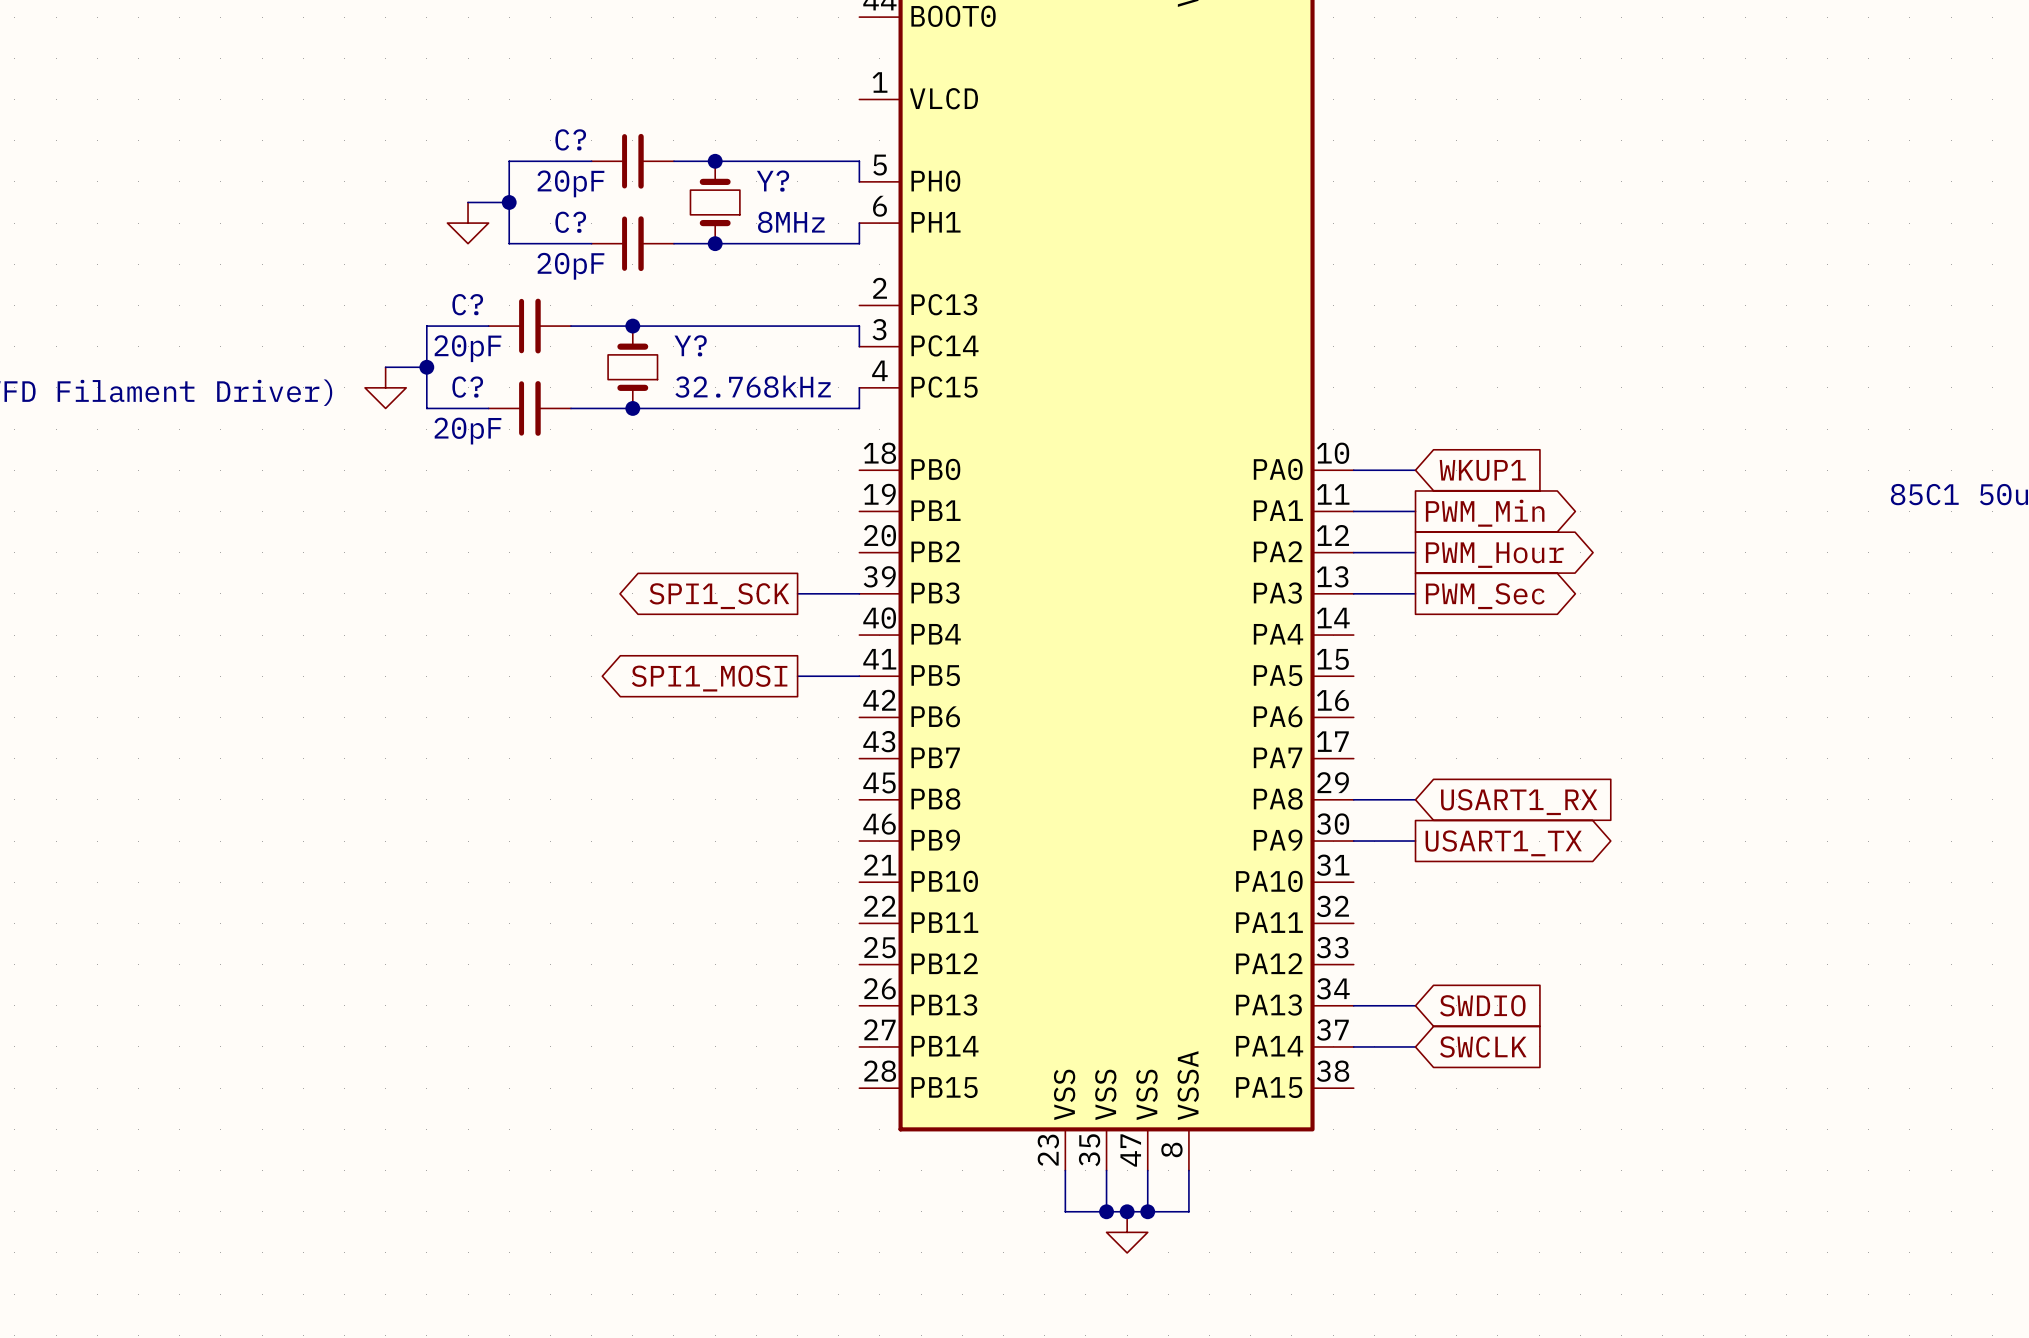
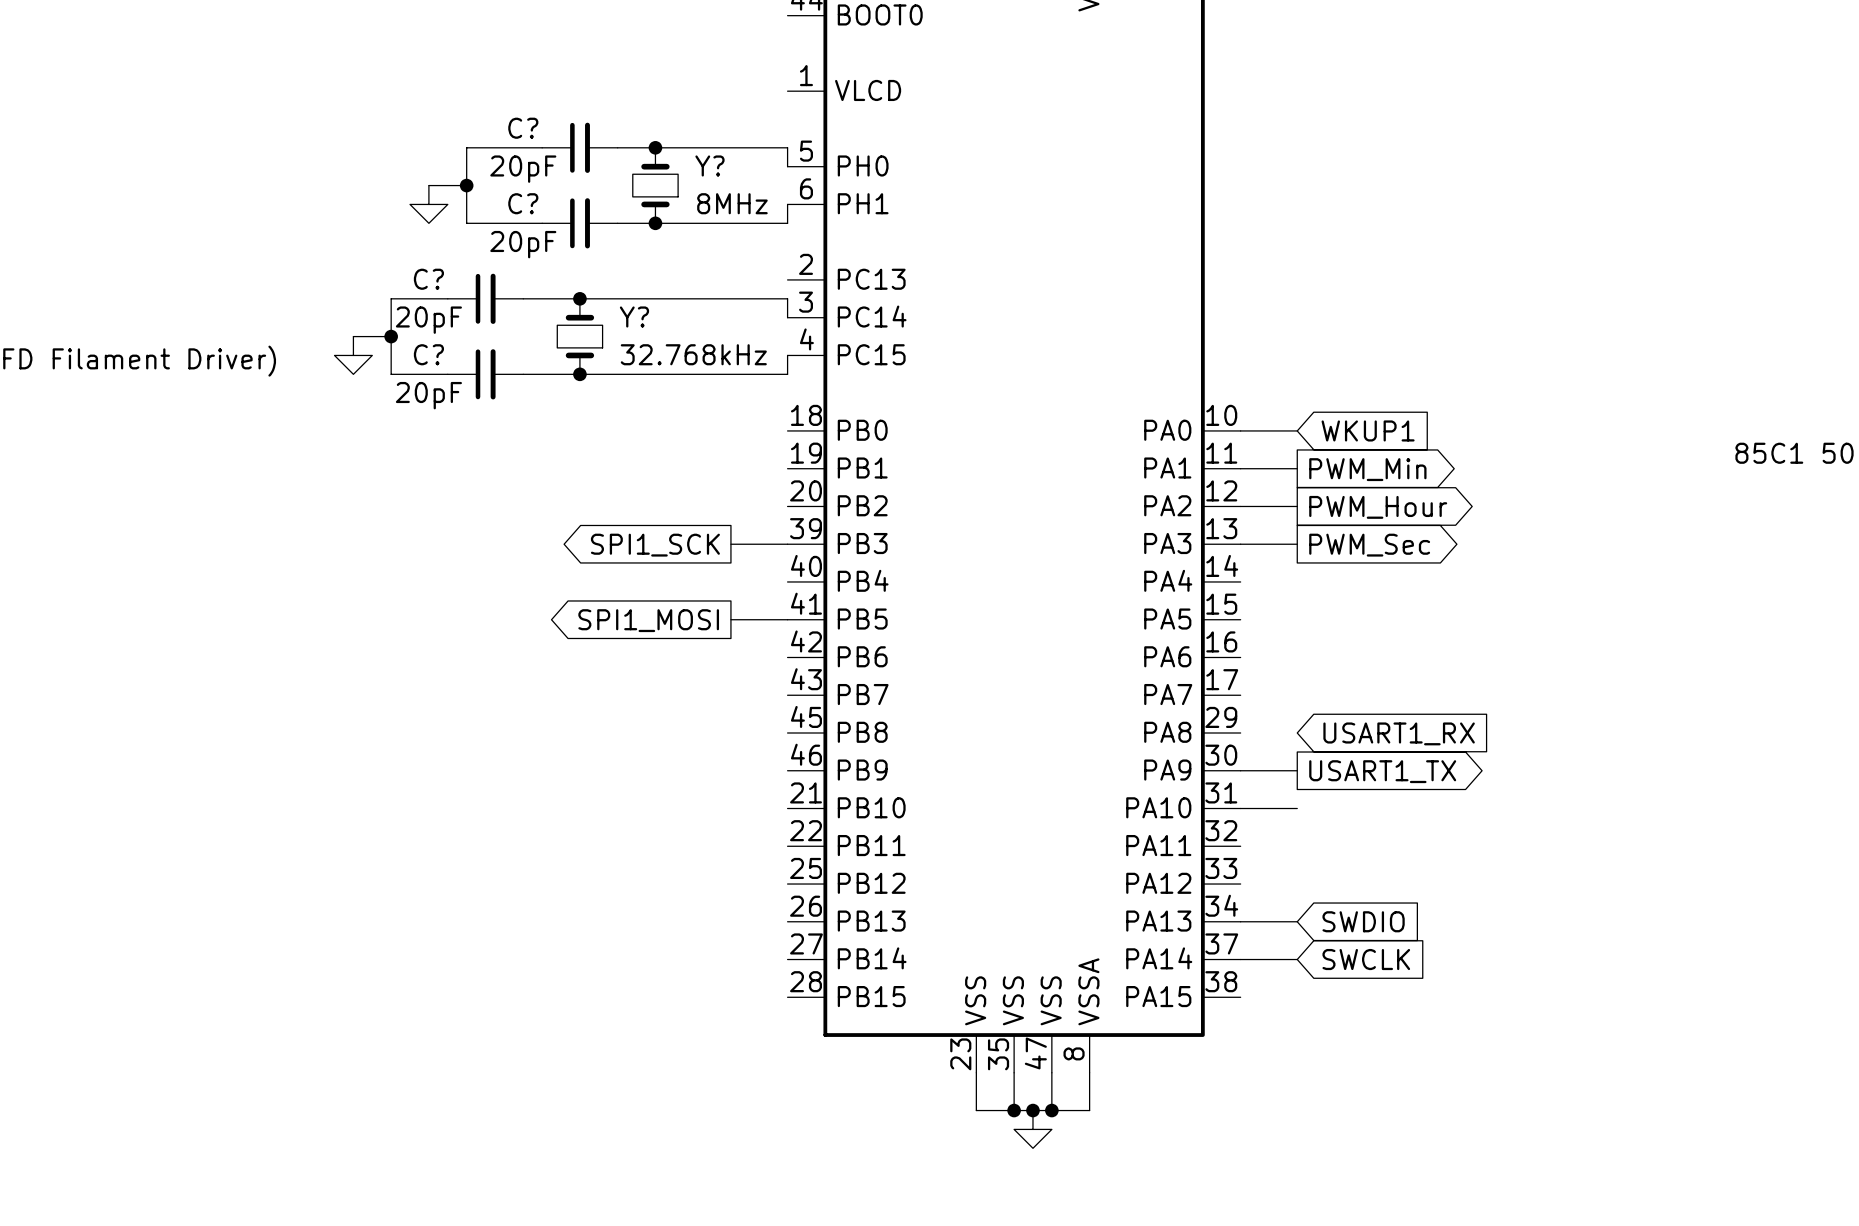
wire: (1353, 799) (1415, 799) -> (1240, 808) (1297, 808)

